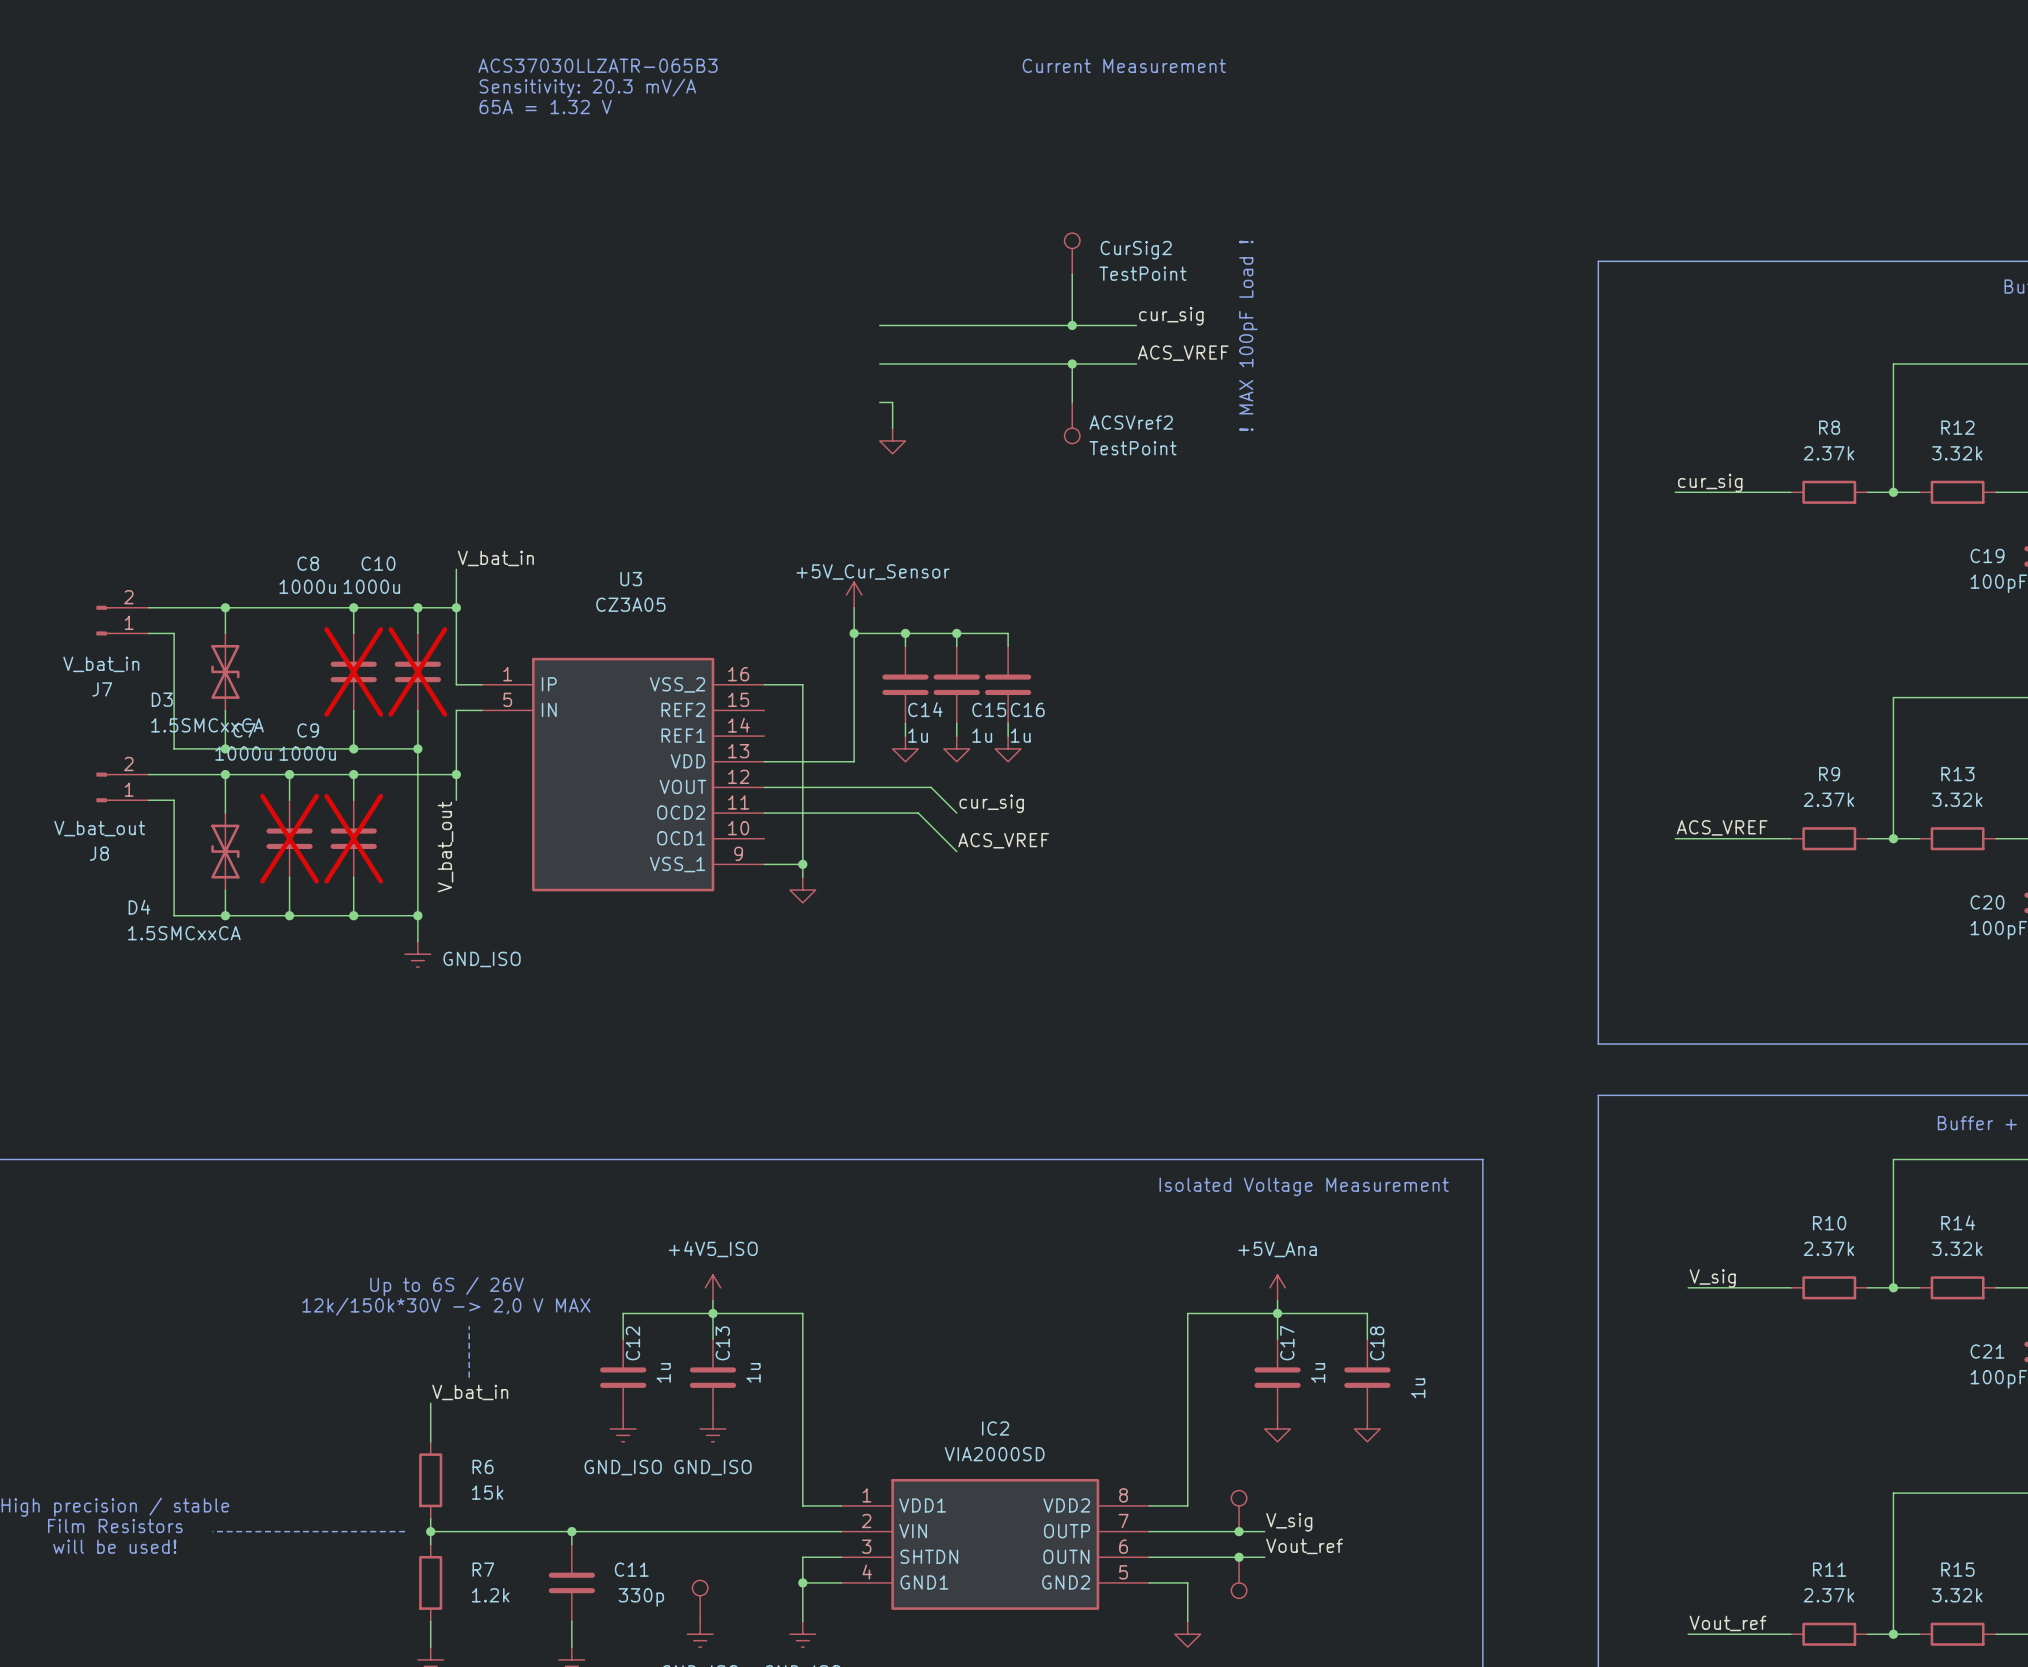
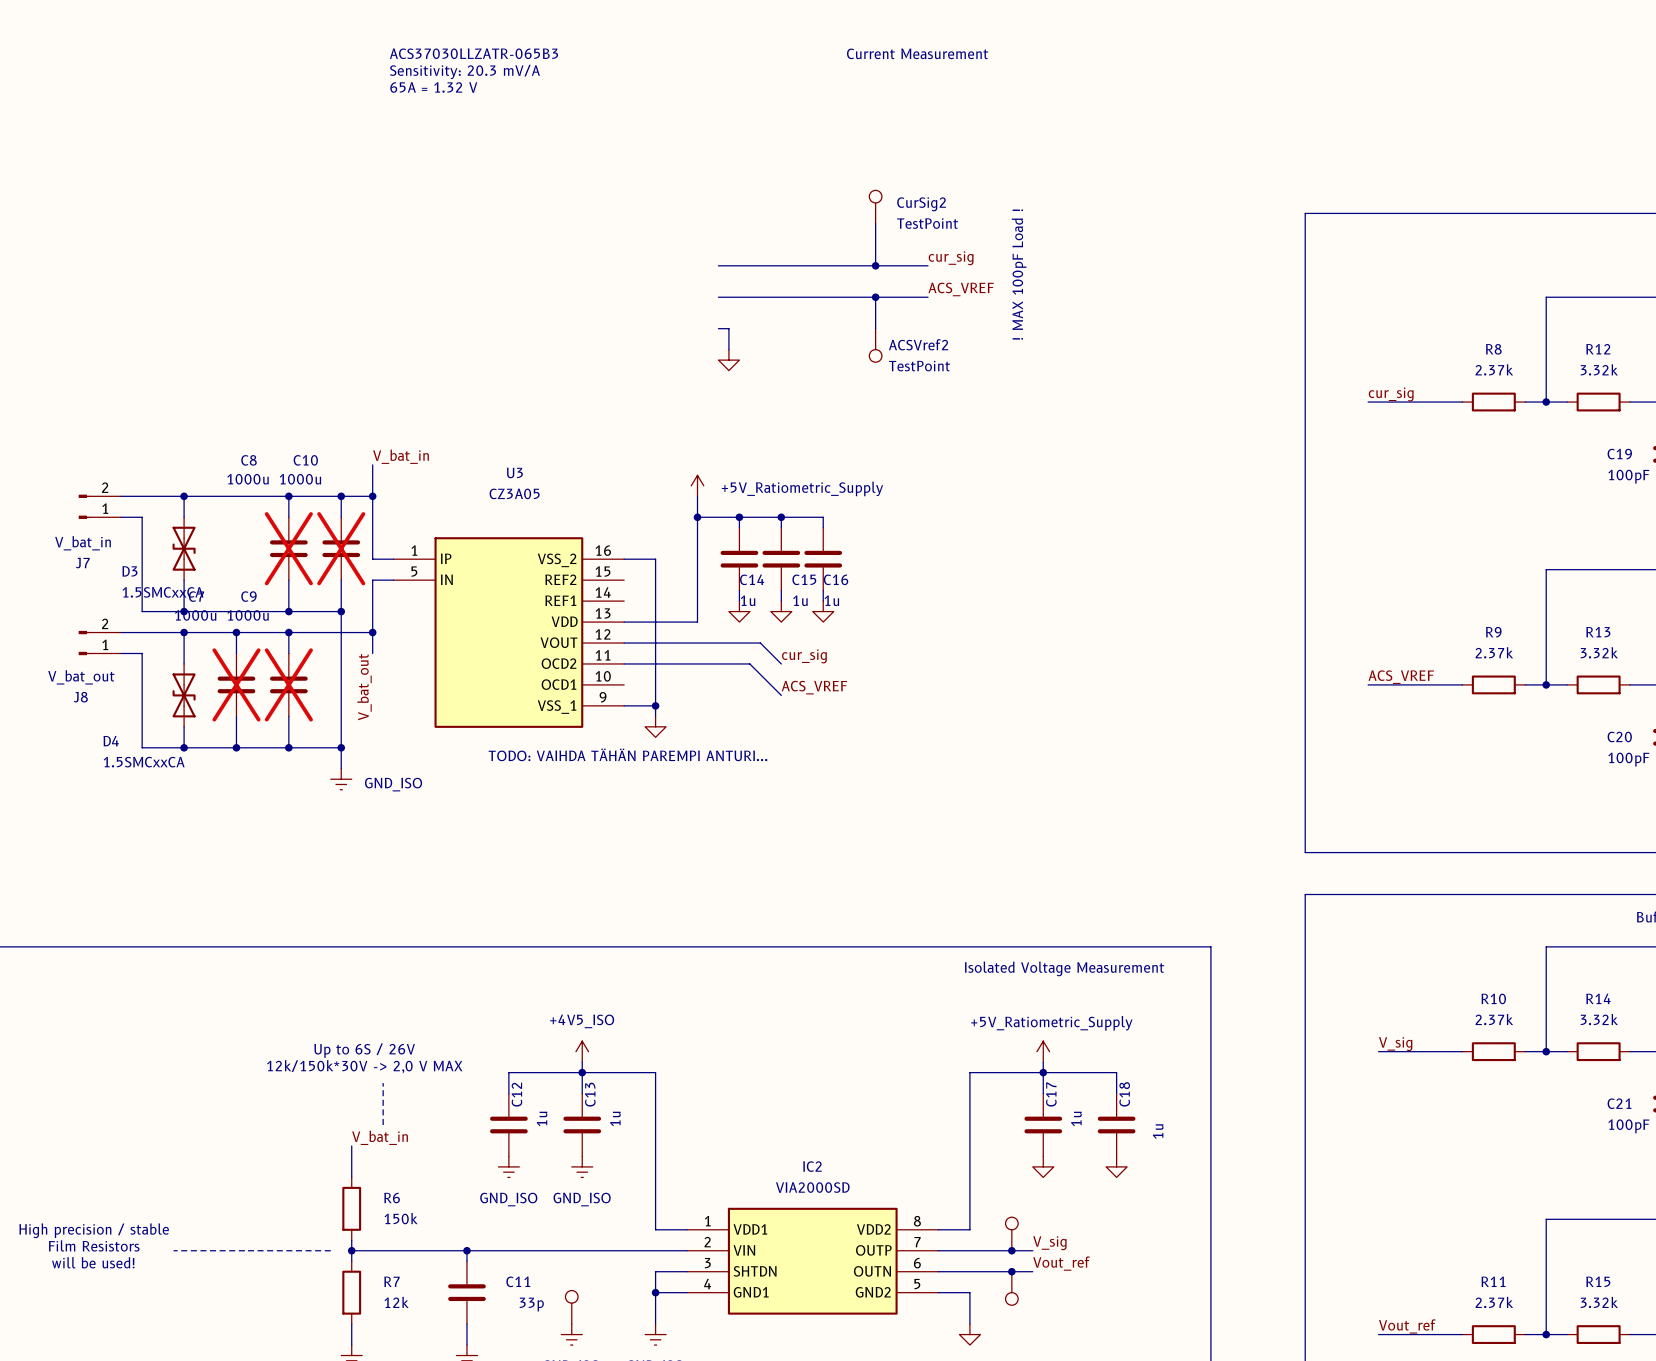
power symbol: +5V_Cur_Sensor (854, 594) -> +5V_Ratiometric_Supply (697, 485)
text: none -> TODO: VAIHDA TÄHÄN PAREMPI ANTURI... (627, 754)
power symbol: +5V_Ana (1277, 1287) -> +5V_Ratiometric_Supply (1043, 1051)
R6 value: 15k (487, 1492) -> 150k (401, 1218)
R7 value: 1.2k (490, 1595) -> 12k (396, 1302)
C11 value: 330p (641, 1597) -> 33p (531, 1304)

